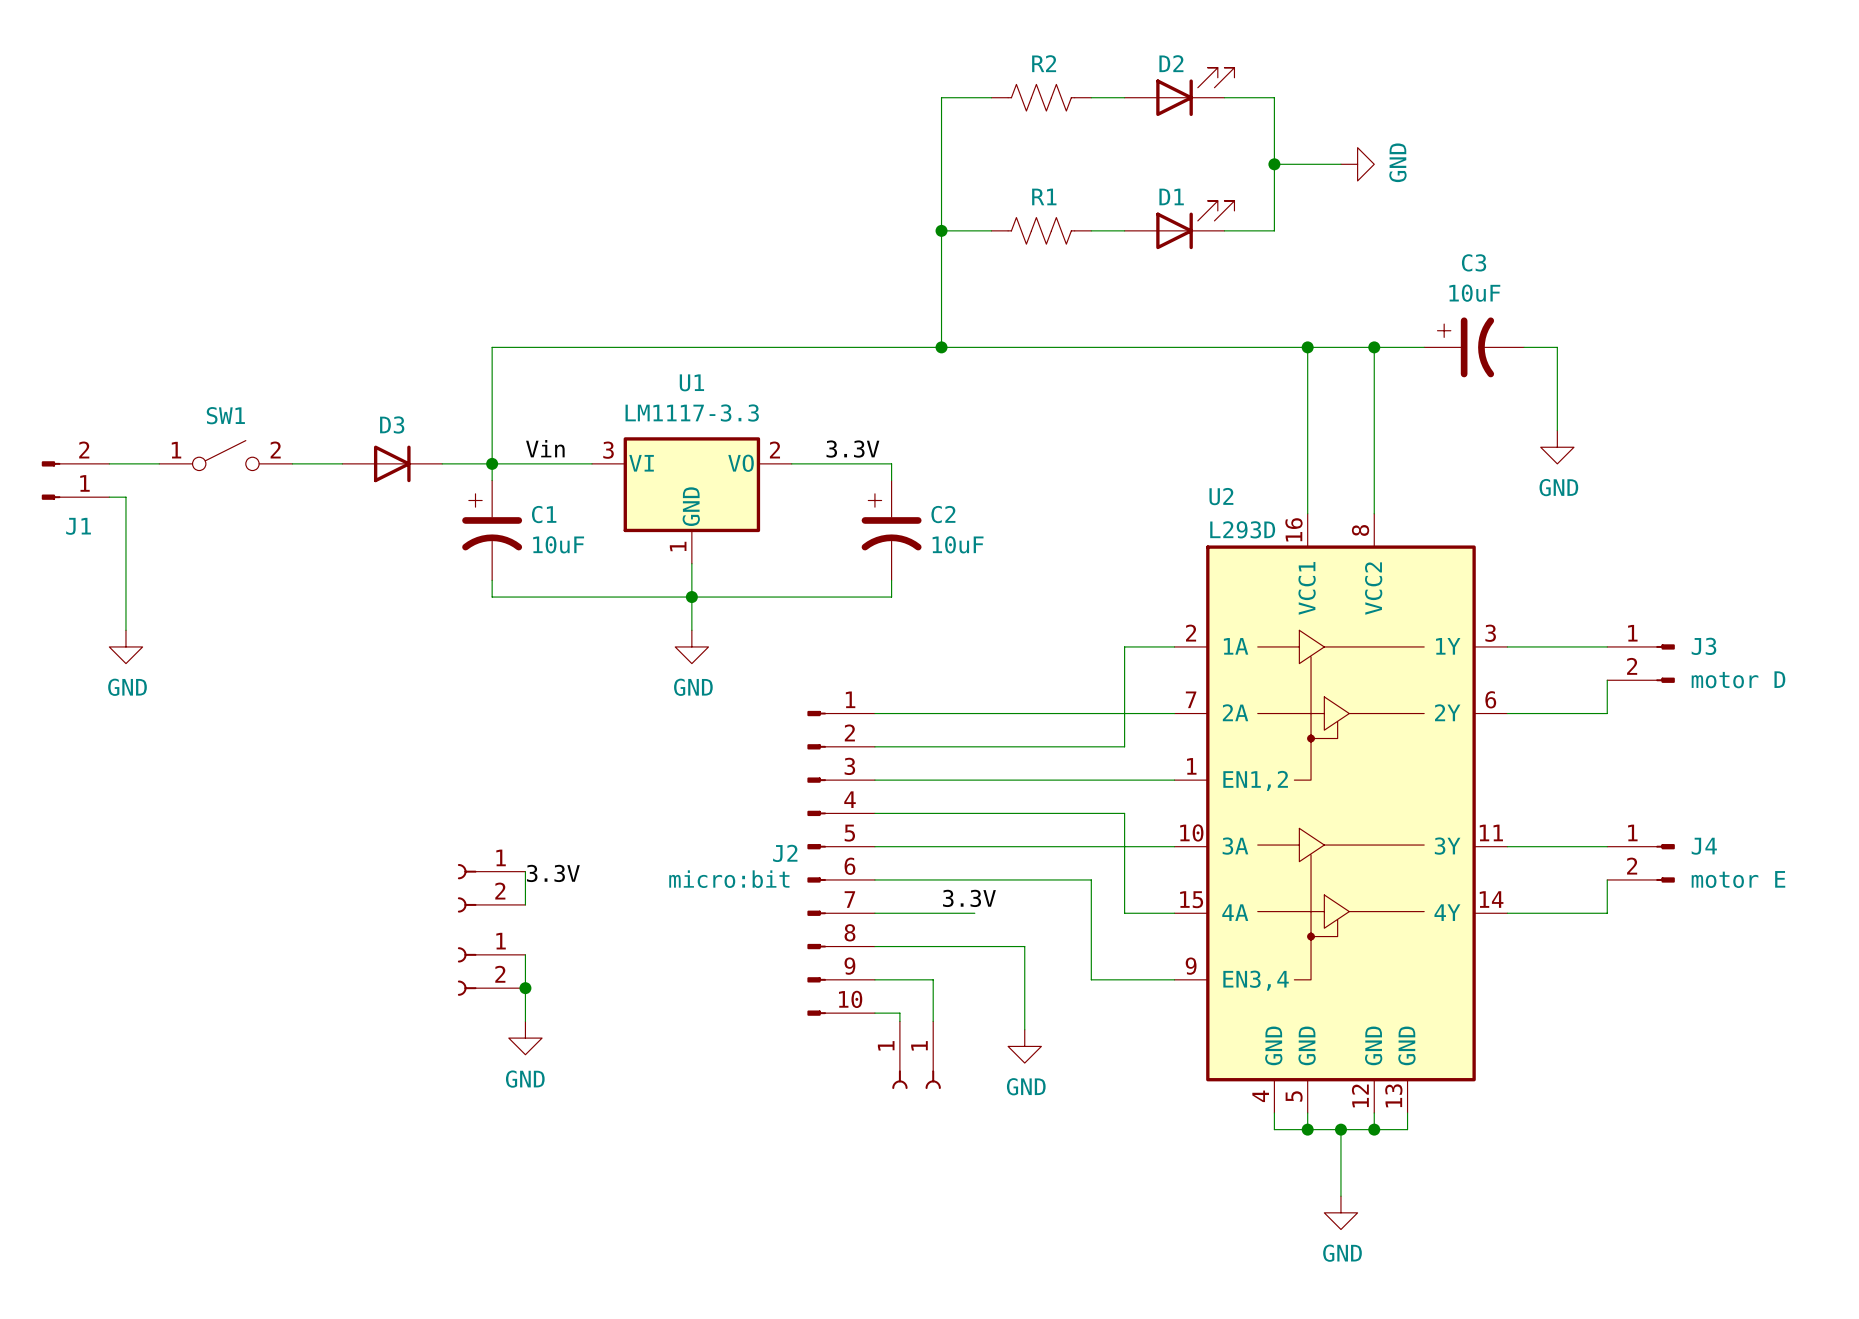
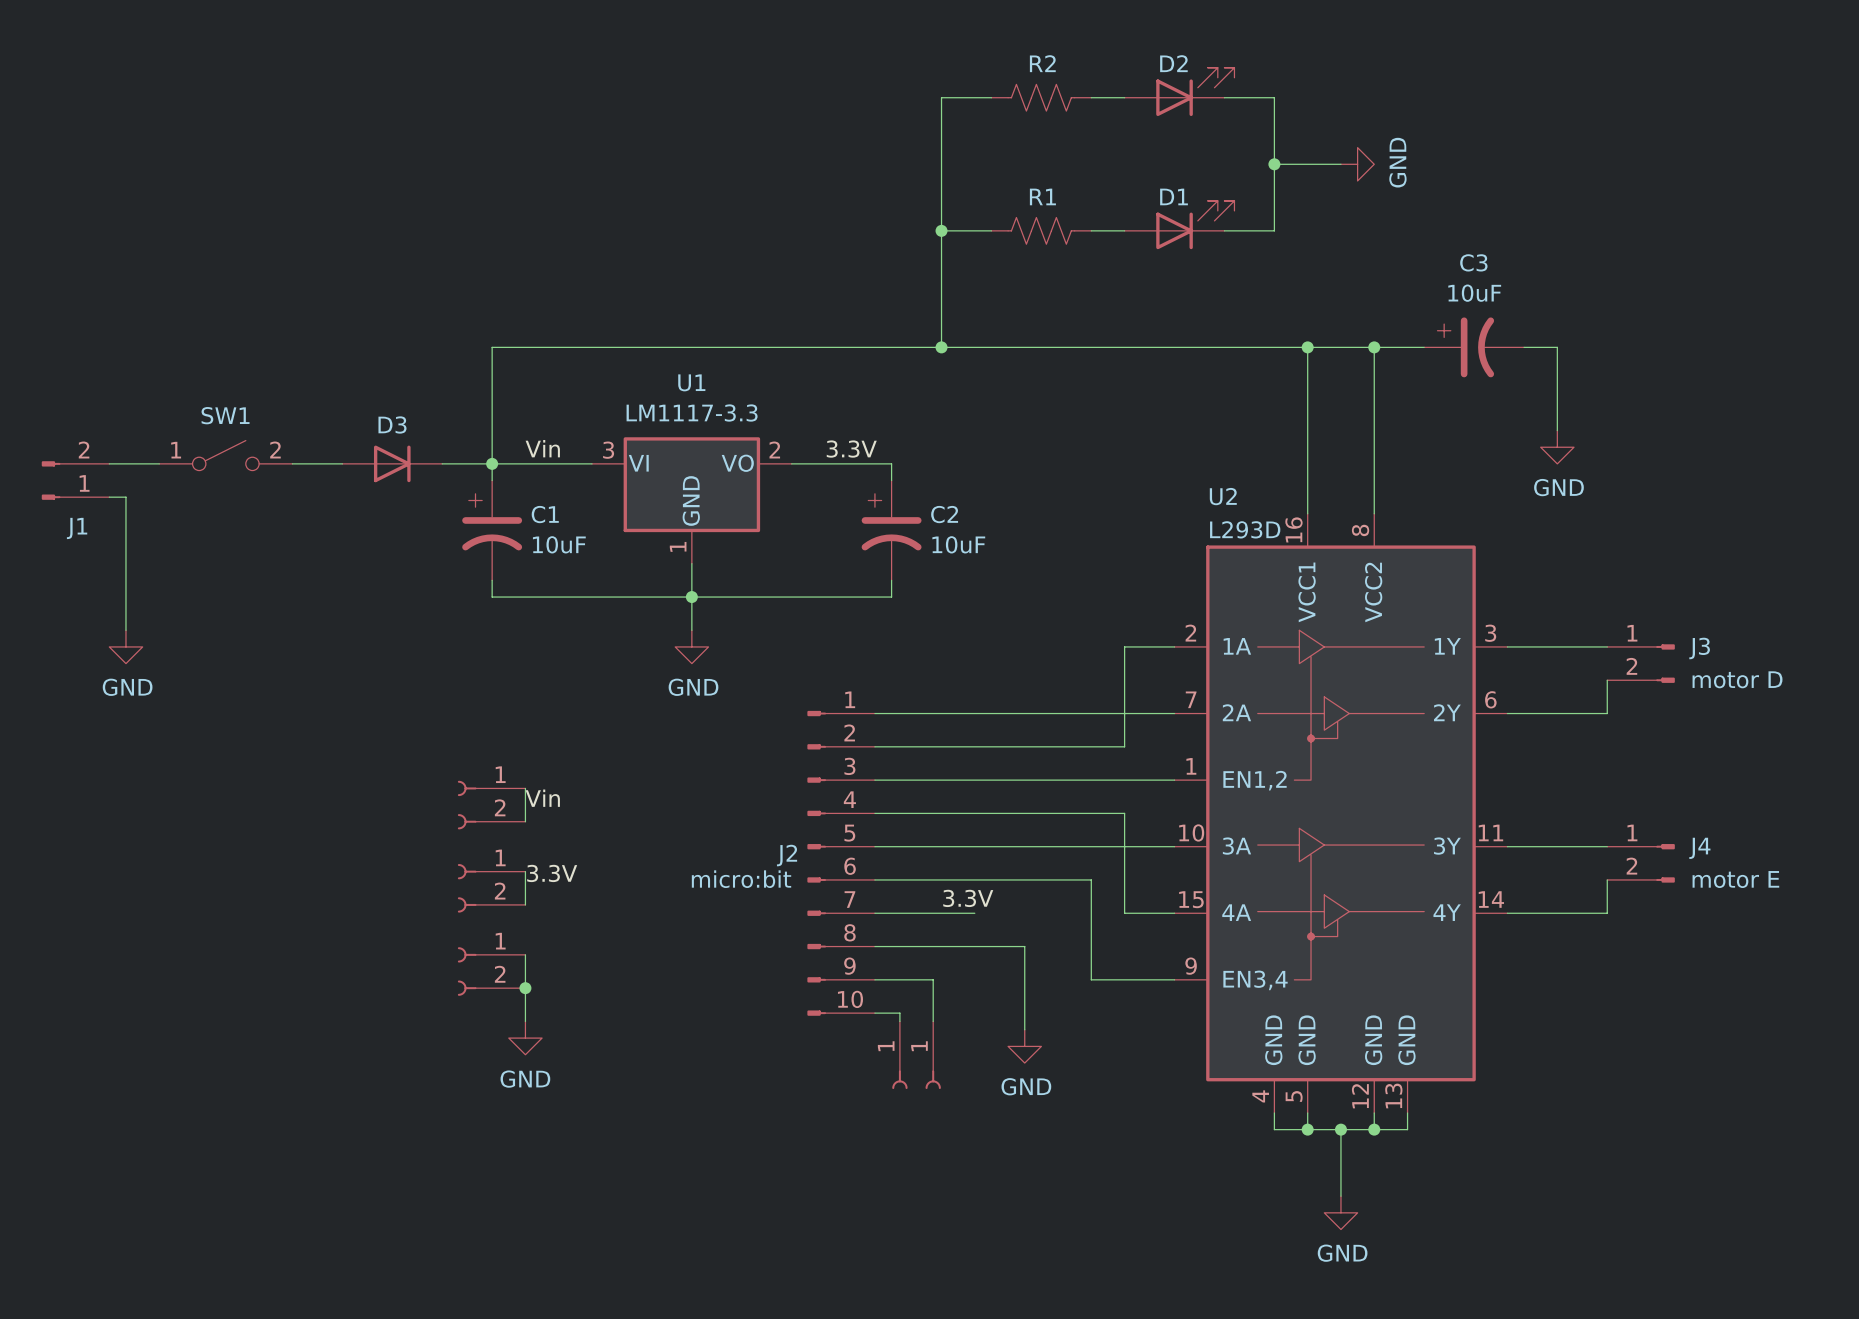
wire: none -> (525, 788) (525, 821)
label: none -> Vin (542, 798)
part: none -> (491, 805)

